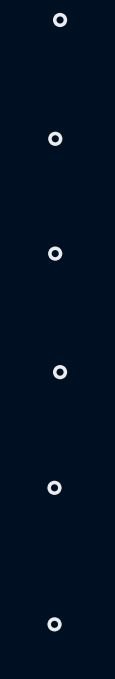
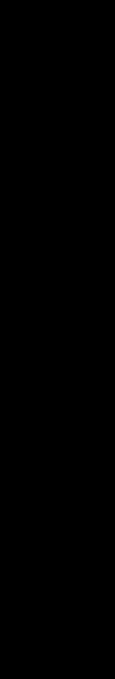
via: (60, 19) -> none
via: (55, 138) -> none
via: (55, 253) -> none
via: (60, 372) -> none
via: (54, 487) -> none
via: (54, 624) -> none

